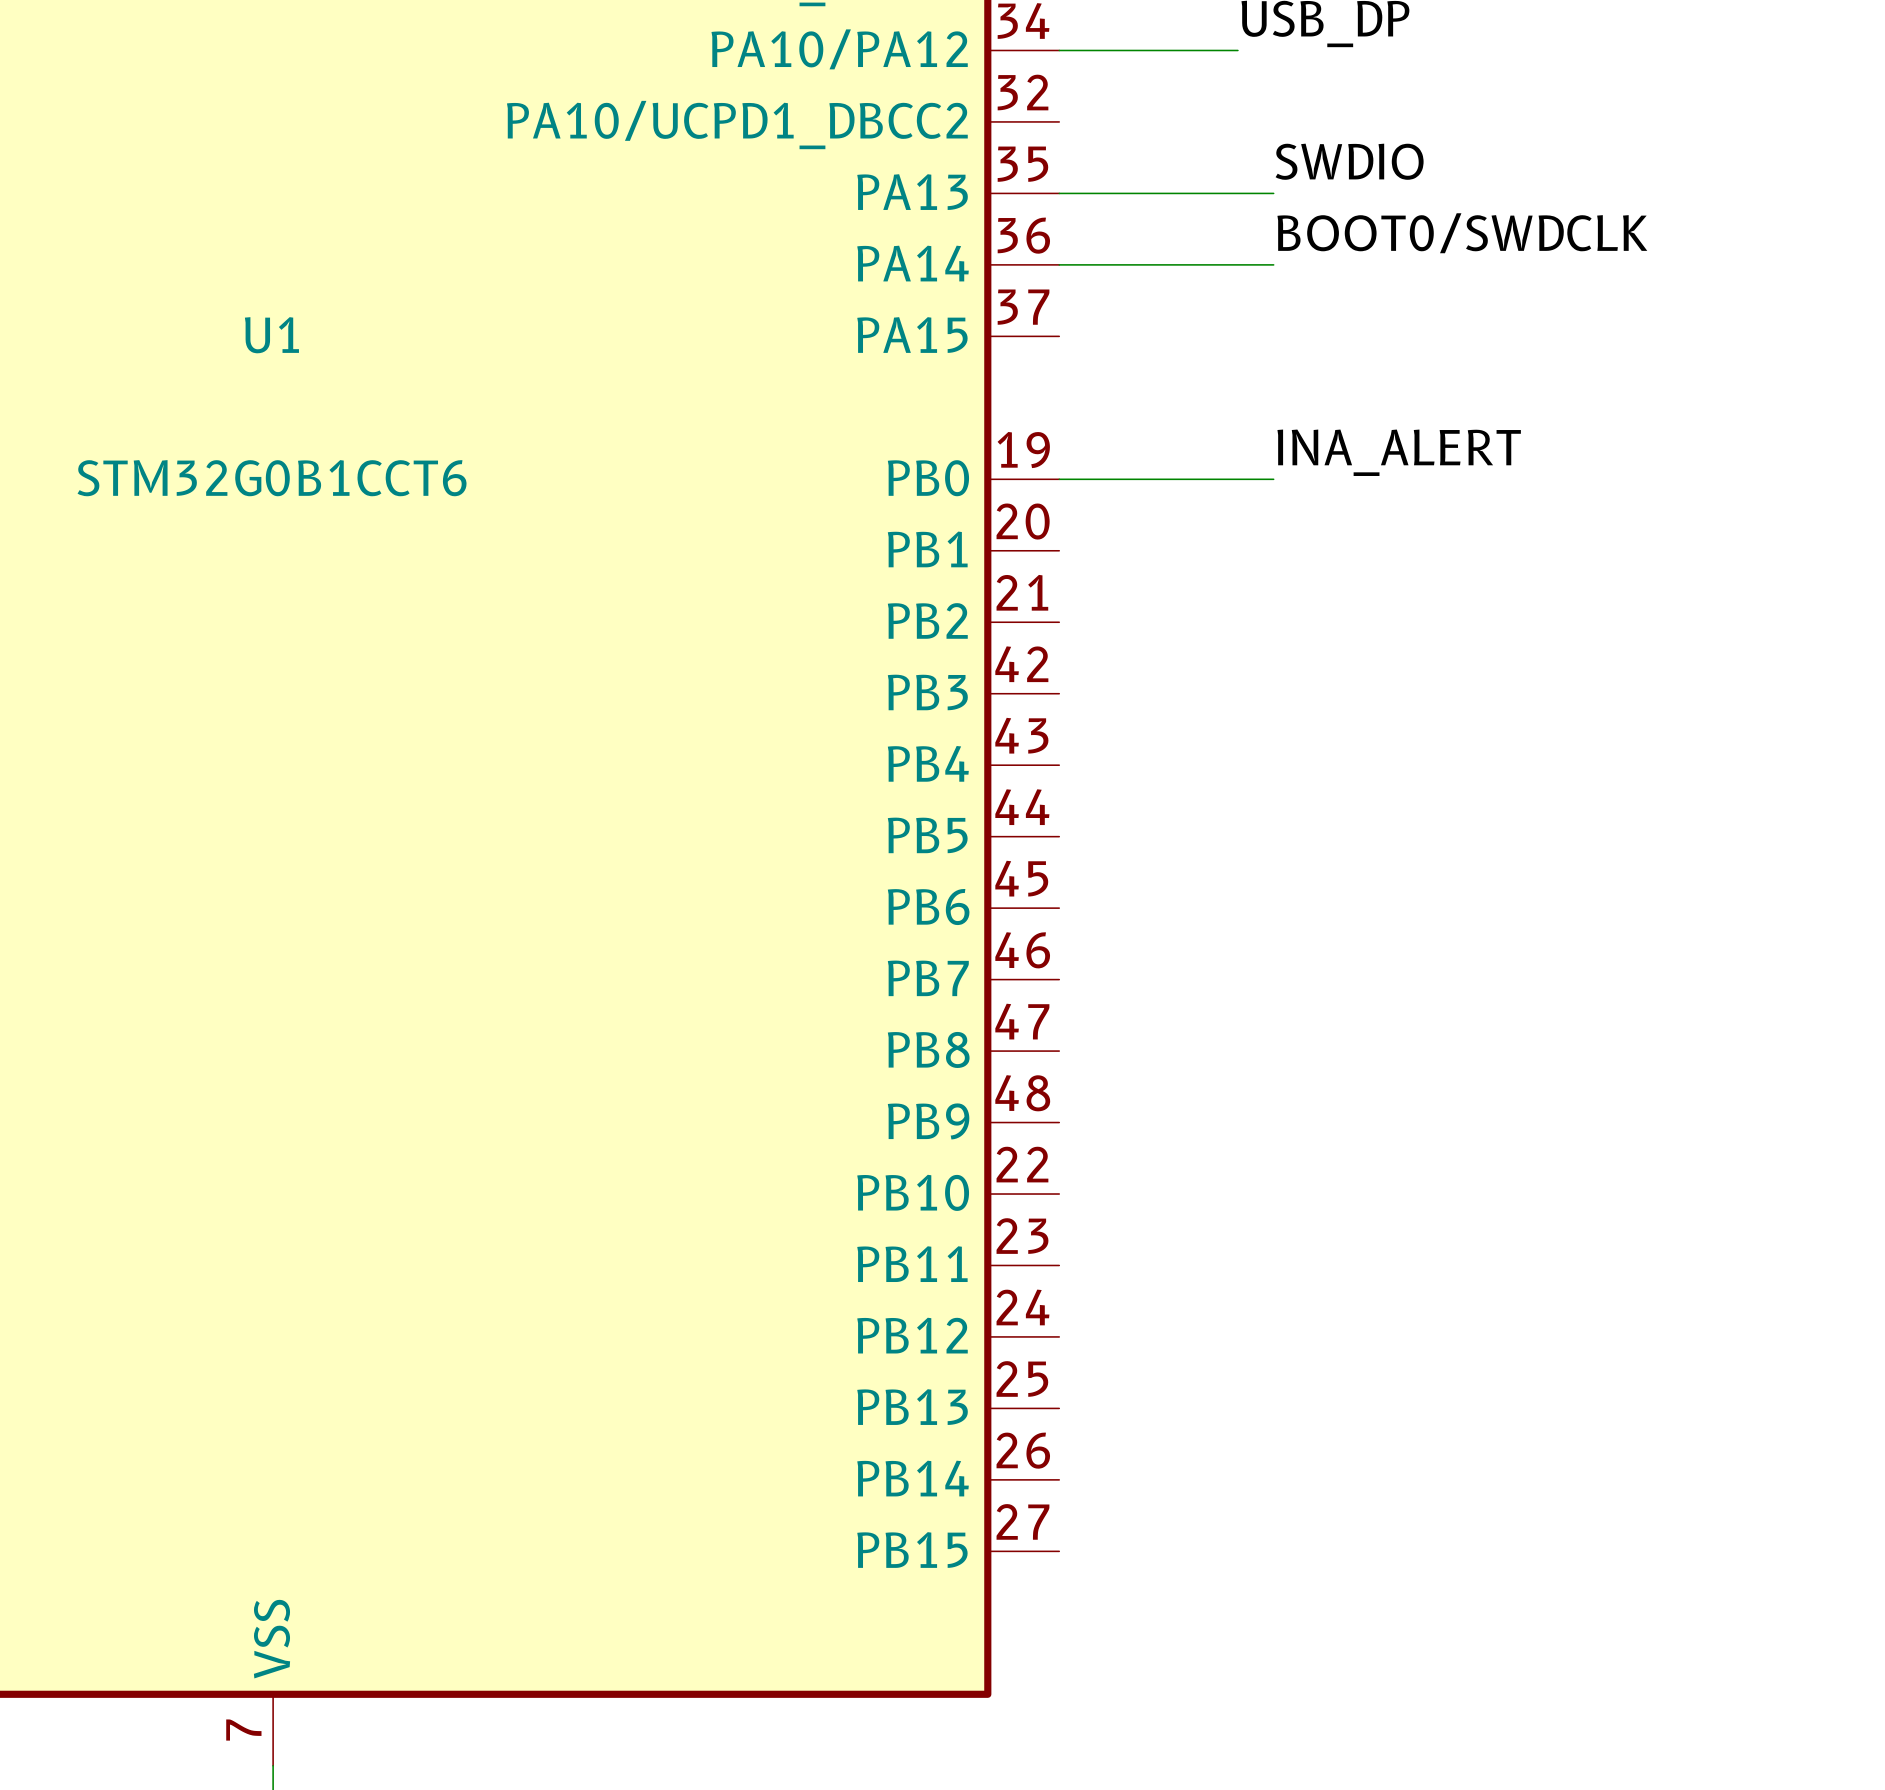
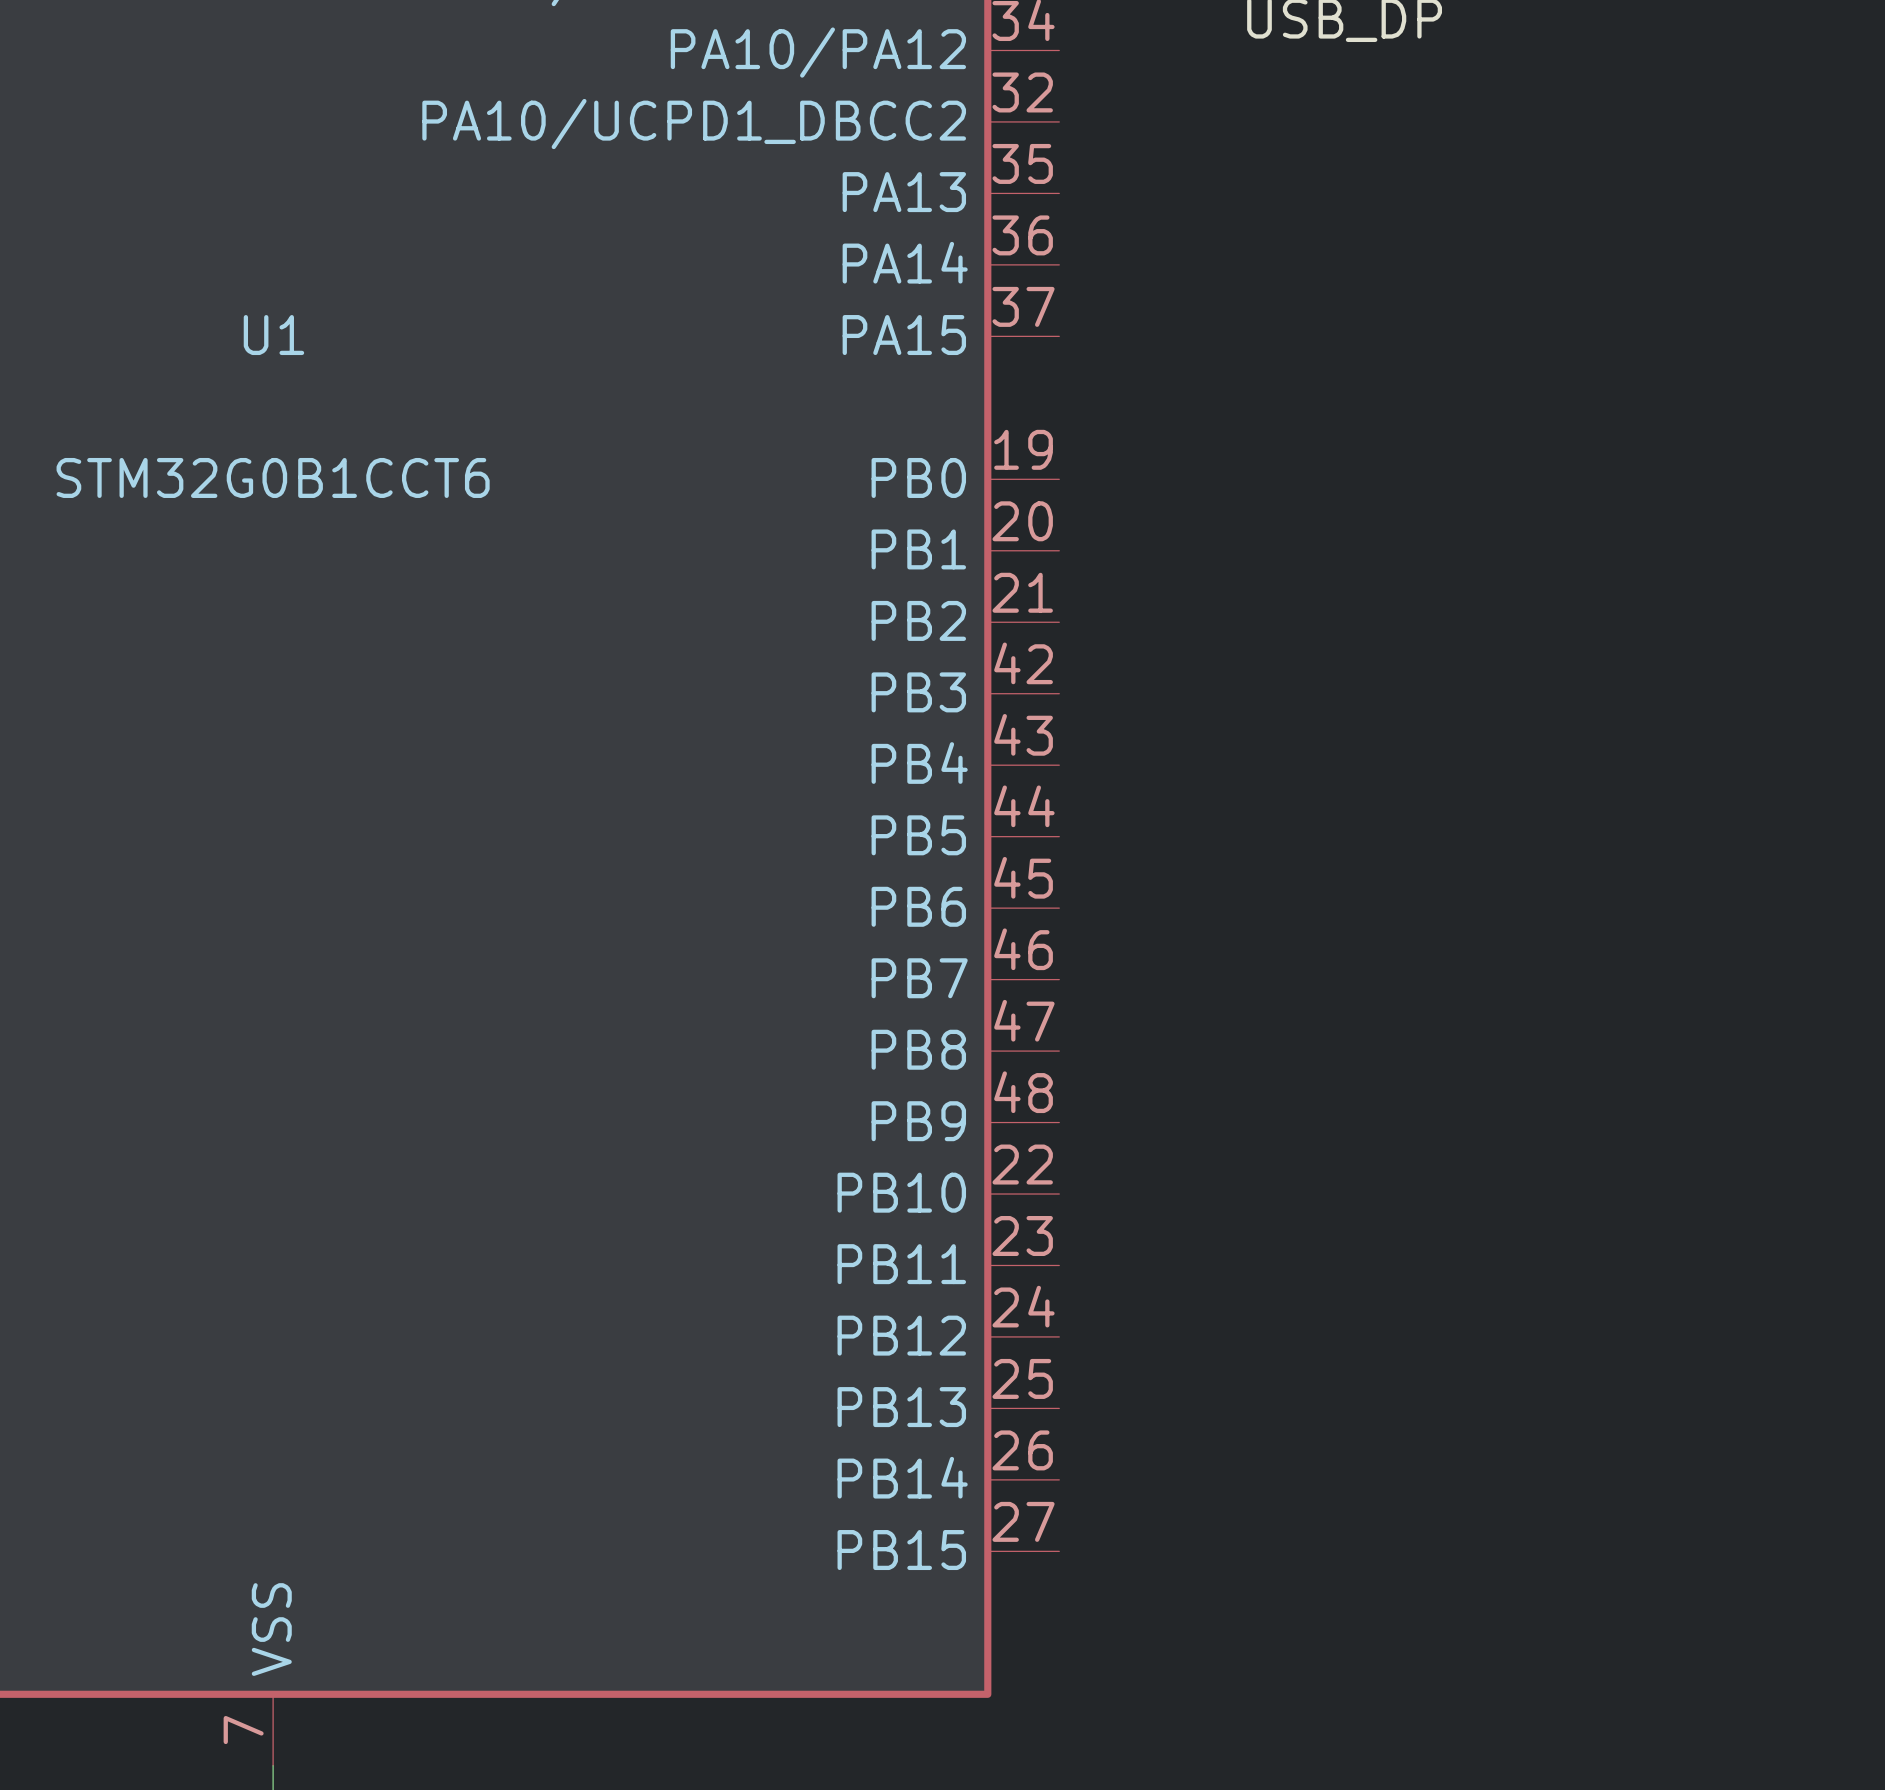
wire: (1059, 50) (1237, 50) -> none
label: SWDIO (1349, 161) -> none
wire: (1059, 193) (1273, 193) -> none
label: BOOT0/SWDCLK (1462, 233) -> none
wire: (1059, 264) (1273, 264) -> none
label: INA_ALERT (1399, 452) -> none
wire: (1059, 479) (1273, 479) -> none

